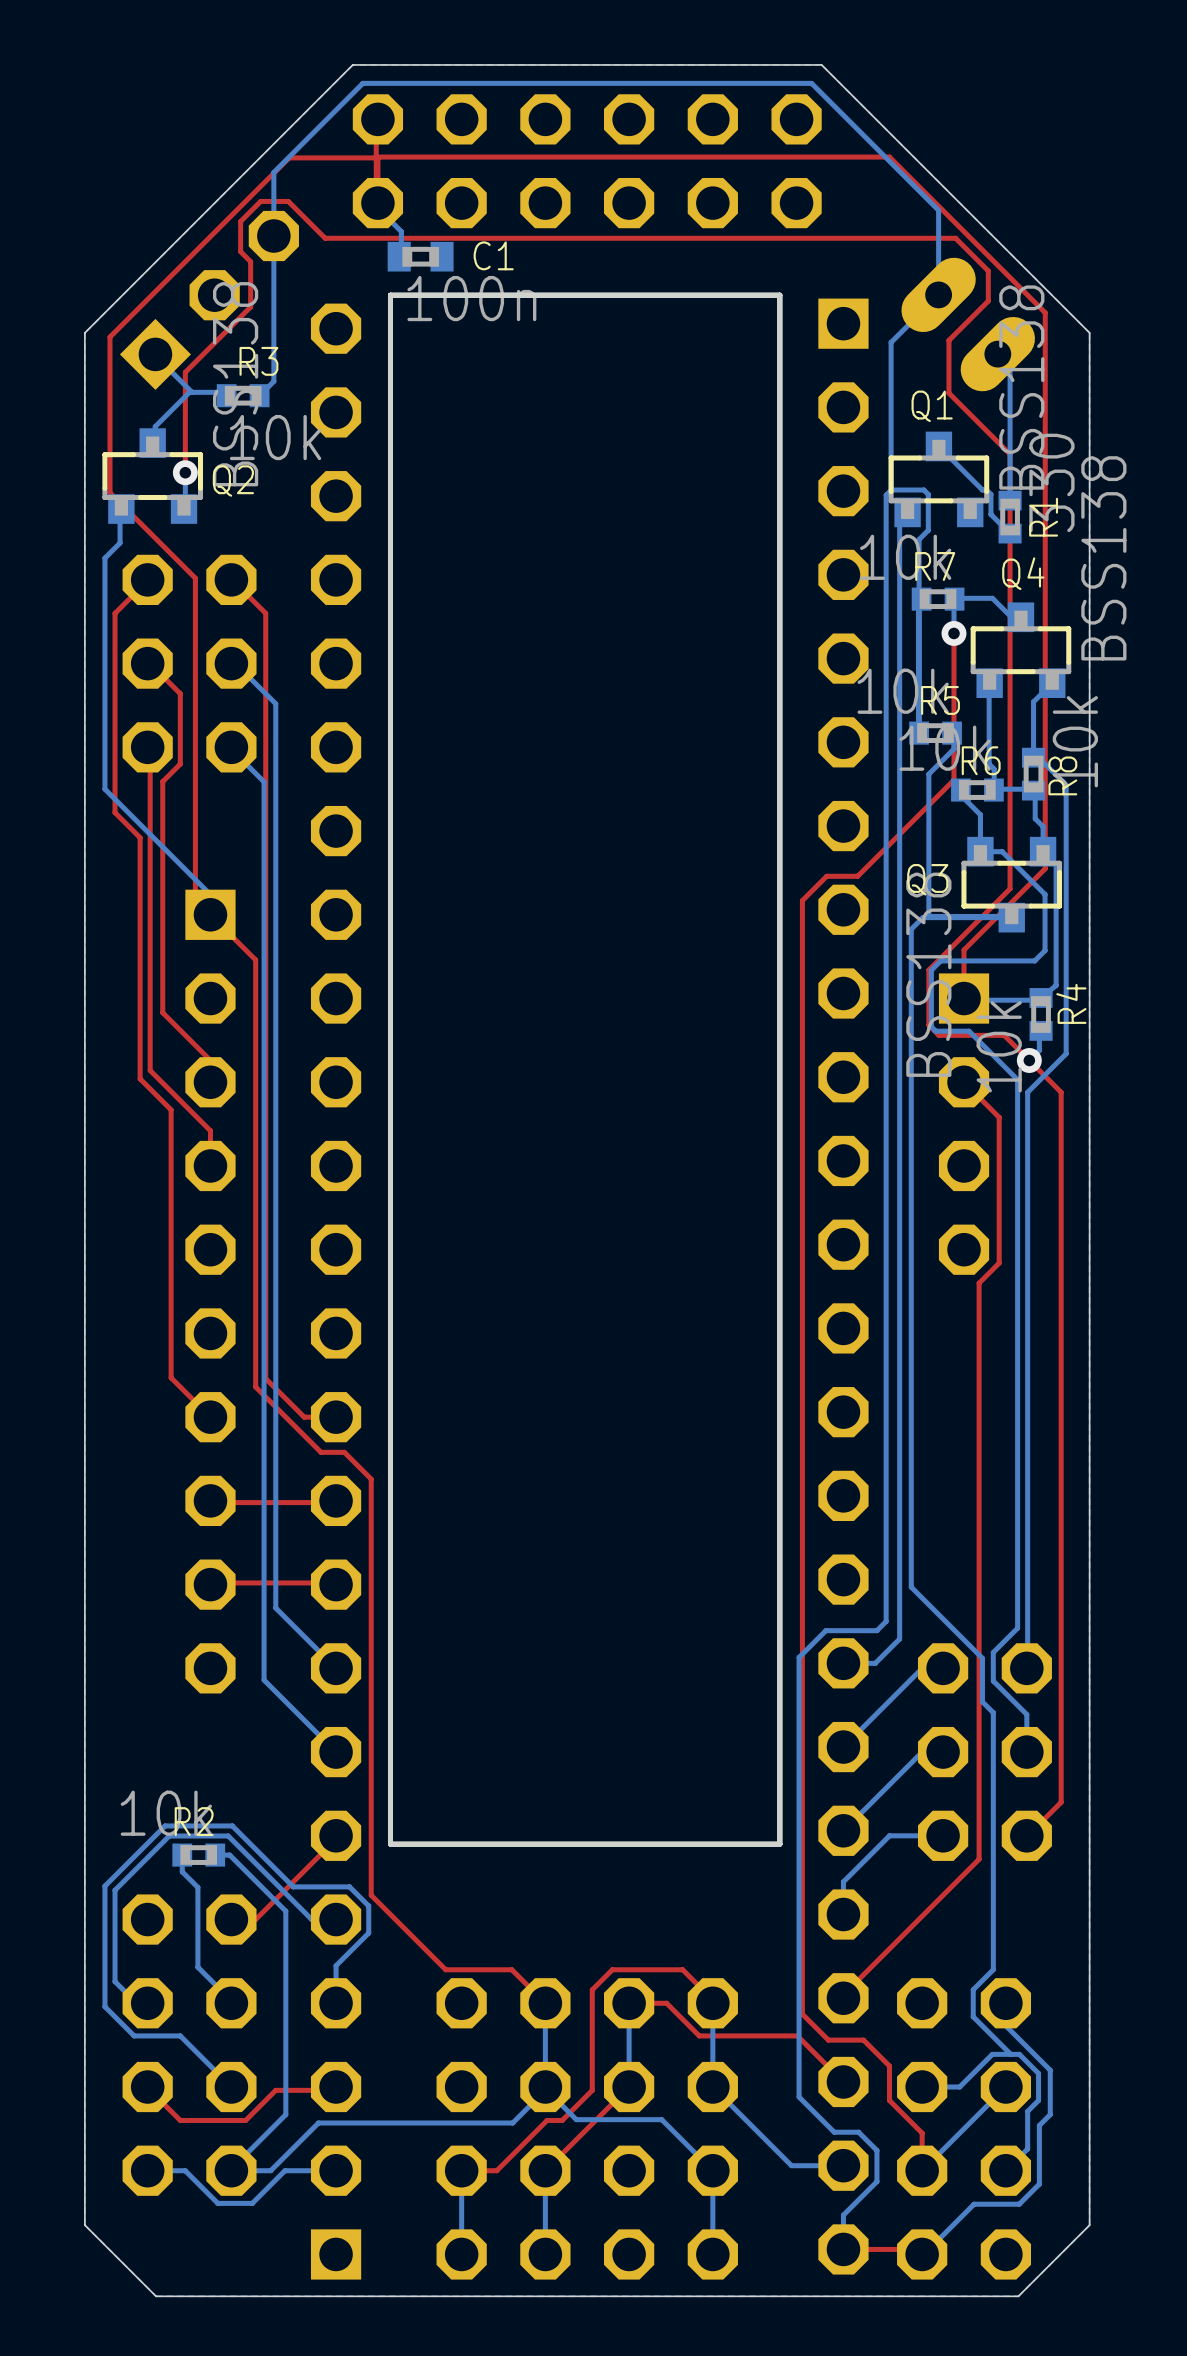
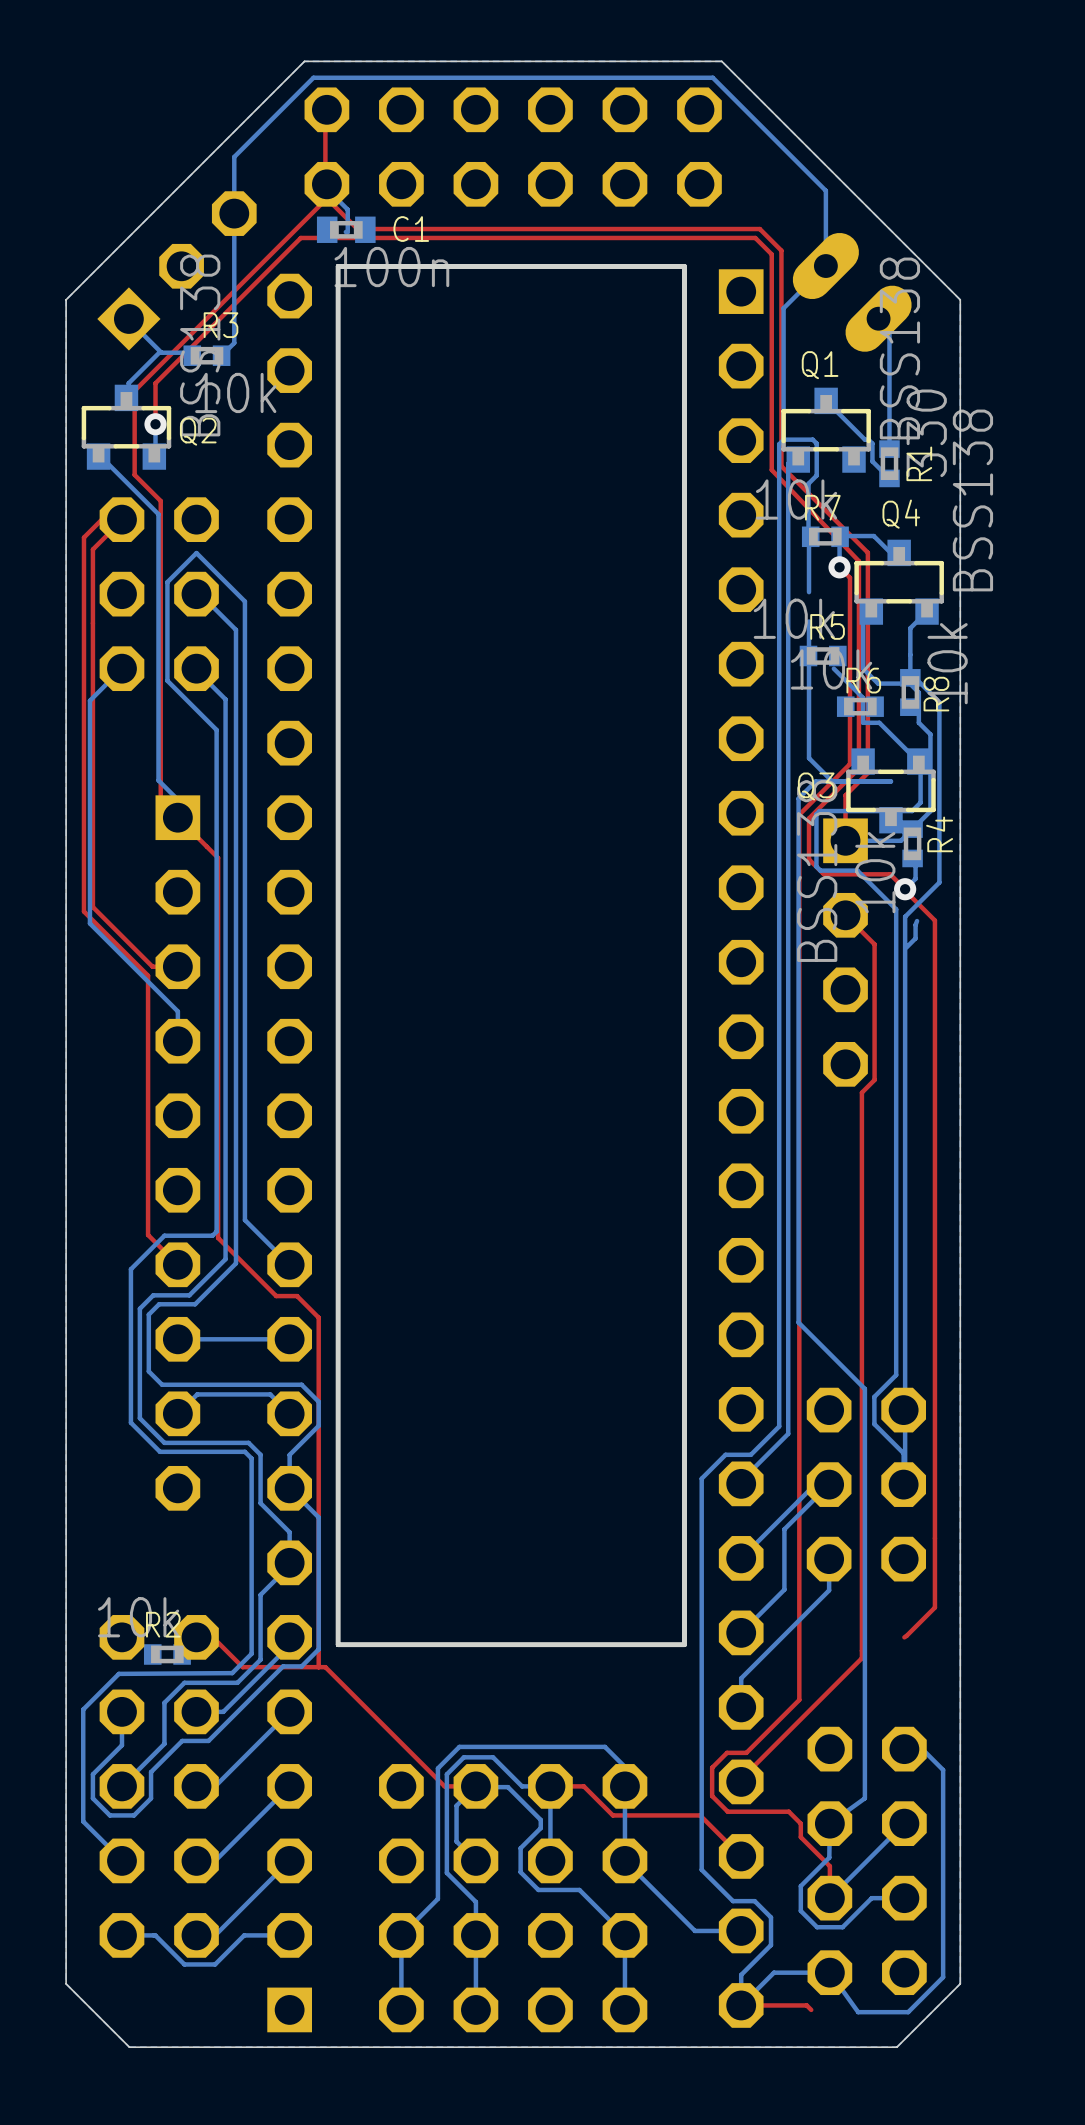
top track: (376, 157) (289, 157) (110, 337) (110, 492) (195, 578) (195, 899) -> (326, 198) (134, 390) (134, 474) (160, 501) (160, 800) (164, 804)
top track: (376, 191) (377, 203) (377, 157) (889, 157) (1045, 312) (1045, 868) (964, 949) (964, 998) -> none
top track: none -> (326, 198) (357, 229) (759, 229) (781, 250) (781, 466) (867, 552) (867, 772) (845, 795) (845, 840)
C1 position: (420, 256) -> (346, 229)
top track: (185, 426) (185, 372) (250, 306) (250, 261) (240, 251) (240, 221) (260, 201) (288, 201) (325, 238) (955, 238) (988, 270) (988, 301) (948, 340) (948, 393) (1010, 454) (1010, 888) (928, 970) (928, 1025) (938, 1035) (1004, 1035) (1061, 1092) -> (155, 383) (300, 237) (755, 237) (771, 254) (771, 469) (858, 561) (858, 768) (809, 818) (809, 859) (823, 874) (890, 874) (934, 920) (934, 975)
bottom track: (121, 509) (120, 543) (104, 558) (104, 789) (188, 872) -> (98, 456) (100, 456) (158, 514) (158, 780)
bottom track: (899, 513) (899, 1638) (875, 1663) (843, 1663) -> (791, 460) (788, 463) (788, 1433) (741, 1480) (741, 1483)
top track: (231, 579) (265, 613) (265, 1378) (304, 1417) (336, 1417) -> none
bottom track: (919, 596) (919, 733) (918, 603) (921, 599) -> (808, 534) (810, 536) (809, 538) (809, 592)
top track: (953, 633) (953, 780) (857, 876) (826, 876) (802, 900) (802, 2014) (828, 2040) (863, 2040) (889, 2066) (889, 2100) (922, 2133) (922, 2170) -> (839, 567) (849, 577) (849, 764) (799, 814) (799, 1699) (746, 1752) (727, 1752) (712, 1767) (712, 1796) (727, 1811) (788, 1811) (800, 1823) (800, 1837) (829, 1866) (829, 1898)
top track: (147, 663) (150, 663) (180, 693) (180, 764) (162, 781) (162, 1012) (210, 1060) (210, 1082) -> (92, 726) (92, 907) (152, 966) (177, 966)
bottom track: (989, 683) (989, 764) (994, 769) (994, 789) -> (870, 612) (863, 619) (863, 668) (878, 683) (910, 683)
bottom track: none -> (809, 621) (809, 758) (832, 781)
bottom track: (952, 733) (953, 733) (953, 749) (928, 774) (928, 916) (1011, 917) (922, 917) (911, 929) (911, 1587) (982, 1658) -> (890, 781) (815, 781) (798, 798) (798, 1322) (864, 1388) (864, 1479)
top track: (147, 747) (150, 749) (150, 1070) (210, 1130) (210, 1165) -> none
bottom track: none -> (121, 668) (89, 700) (89, 923) (177, 1011) (177, 1041)
bottom track: (994, 789) (1033, 790) -> none
bottom track: (960, 790) (960, 795) (980, 814) (980, 851) (1002, 851) (1045, 894) -> (833, 668) (863, 697) (863, 722) (879, 722) (920, 763) (920, 799)
bottom track: (1033, 790) (1035, 792) (1035, 818) (1043, 826) (1043, 851) (1056, 864) -> (910, 684) (918, 692) (918, 722) (930, 734) (930, 773)
top track: (115, 812) (140, 837) (140, 1078) (171, 1109) (171, 1377) (176, 1383) -> (121, 519) (101, 519) (83, 537) (83, 911) (148, 975) (148, 1234)
bottom track: (1045, 897) (1045, 950) (1034, 960) (940, 960) (931, 970) (931, 1026) (935, 1031) (969, 1031) (1017, 1079) -> (920, 802) (912, 811) (819, 811) (816, 814) (816, 866) (820, 870) (857, 870) (896, 909) (896, 964)
bottom track: (1056, 907) (1056, 985) (1039, 1000) (964, 1000) (964, 998) -> (930, 811) (900, 840) (845, 840)
bottom track: none -> (912, 858) (915, 866) (915, 878) (905, 889)
bottom track: (1066, 987) (1066, 1053) (1027, 1092) -> (939, 882) (905, 916) (905, 975)
R4 position: (1041, 1014) -> (912, 843)
via position: (1029, 1060) -> (905, 889)
top track: (964, 1082) (999, 1117) (999, 1263) (979, 1283) -> (845, 915) (874, 944) (874, 1079) (861, 1092) (861, 1145)
part position: (964, 1124) -> (845, 952)
bottom track: (264, 1410) (264, 1680) (336, 1752) -> (225, 1259) (189, 1295) (153, 1295) (139, 1308) (139, 1418) (164, 1442) (248, 1442) (260, 1454) (260, 1503) (289, 1532) (289, 1565) (260, 1594) (260, 1659) (237, 1682) (184, 1682) (164, 1702) (164, 1743) (121, 1786)
bottom track: (275, 1415) (275, 1608) (336, 1668) -> (235, 1263) (195, 1304) (159, 1304) (148, 1314) (148, 1371) (162, 1384) (301, 1384) (318, 1401) (318, 1425) (289, 1454) (289, 1488) (318, 1517) (318, 1649) (301, 1666) (283, 1666) (208, 1740) (182, 1740) (151, 1772) (151, 1798) (134, 1815)
bottom track: none -> (289, 1264) (244, 1220) (244, 601) (196, 553) (167, 582) (167, 680) (216, 729) (216, 1231) (212, 1235) (164, 1235) (130, 1269) (130, 1422) (159, 1451) (244, 1451) (251, 1458) (251, 1653) (232, 1673) (118, 1673) (83, 1709) (83, 1821) (121, 1860)
top track: (368, 1476) (371, 1479) (371, 1895) (445, 1969) (511, 1969) (545, 2003) -> (318, 1317) (318, 1667)
top track: (336, 1500) (336, 1502) (210, 1502) (210, 1500) -> none
bottom track: none -> (289, 1339) (177, 1339)
bottom track: (1017, 1541) (1017, 1628) (993, 1652) (993, 1681) (1026, 1714) (1026, 1752) -> (896, 1375) (874, 1396) (874, 1424) (903, 1453) (903, 1484)
top track: (336, 1584) (336, 1582) (210, 1582) (210, 1584) -> none
bottom track: none -> (289, 1413) (270, 1394) (197, 1394) (177, 1413)
bottom track: (886, 1598) (886, 1621) (876, 1630) (854, 1630) -> (779, 1426) (750, 1454)
bottom track: (982, 1701) (993, 1712) (993, 1969) (973, 1989) (973, 2016) (1010, 2054) -> (864, 1518) (864, 1798) (829, 1823) (829, 1857) (800, 1886) (800, 1910) (817, 1927) (842, 1927) (871, 1898) (904, 1898)
bottom track: (943, 1752) (922, 1752) (892, 1782) -> (829, 1484) (784, 1529) (784, 1589)
part position: (984, 1752) -> (866, 1484)
top track: none -> (196, 1637) (213, 1637) (242, 1667) (325, 1667) (444, 1786) (475, 1786)
top track: (336, 1835) (336, 1839) (255, 1919) (231, 1919) -> none
bottom track: none -> (289, 1637) (289, 1645) (223, 1711) (196, 1711)
bottom track: (943, 1835) (889, 1835) -> (829, 1559) (829, 1590) (782, 1637)
bottom track: (182, 1855) (182, 1871) (197, 1887) (197, 1967) (230, 1999) (231, 2003) -> none
bottom track: (215, 1855) (229, 1855) (285, 1911) (285, 2114) (231, 2170) -> none
bottom track: none -> (121, 1711) (121, 1745) (92, 1774) (92, 1798)
bottom track: (336, 1919) (311, 1919) (228, 1836) (169, 1836) (115, 1890) (115, 1981) (136, 2003) (147, 2003) -> (289, 1711) (215, 1786) (196, 1786)
bottom track: none -> (904, 1749) (922, 1749) (943, 1769) (943, 1977) (908, 2012) (858, 2012) (829, 1972) (773, 1972) (741, 2005)
part: none -> (159, 1786)
bottom track: (336, 2003) (336, 1965) (368, 1933) (368, 1906) (349, 1886) (293, 1886) (232, 1825) (165, 1825) (104, 1886) (104, 2006) (115, 2016) -> (289, 1786) (215, 1860) (196, 1860)
bottom track: (545, 2003) (545, 2090) (512, 2123) (318, 2123) (270, 2170) (252, 2170) -> (289, 1860) (215, 1935)
bottom track: none -> (550, 1786) (522, 1786) (493, 1757) (463, 1757) (446, 1774) (446, 1872) (475, 1902) (475, 1935)
top track: (712, 2003) (712, 1999) (682, 1969) (612, 1969) (592, 1989) (592, 2090) (562, 2120) (547, 2120) (496, 2170) (461, 2170) -> none
bottom track: none -> (624, 1786) (624, 1766) (604, 1746) (459, 1746) (437, 1768) (437, 1898) (401, 1935)
bottom track: (1005, 2003) (1005, 2025) (1050, 2070) (1050, 2114) (1039, 2125) (1039, 2184) (1019, 2204) (974, 2204) (922, 2254) -> none
bottom track: (161, 2035) (180, 2035) (231, 2087) -> none
part: (189, 2045) -> none
top track: (336, 2087) (336, 2090) (275, 2090) (245, 2120) (180, 2120) (147, 2087) -> none
top track: (629, 2087) (545, 2170) -> none
bottom track: (922, 2087) (959, 2087) (992, 2054) (1019, 2054) (1038, 2073) (1038, 2100) (1027, 2111) (1027, 2148) (1005, 2170) -> none
bottom track: (1005, 2087) (922, 2170) -> (904, 1823) (829, 1898)
bottom track: (545, 2088) (576, 2119) (615, 2119) -> (475, 1860) (456, 1841) (456, 1805) (475, 1786) (507, 1787) (540, 1819) (540, 1828) (520, 1848) (520, 1872) (538, 1889)
part position: (964, 2128) -> (867, 1860)

